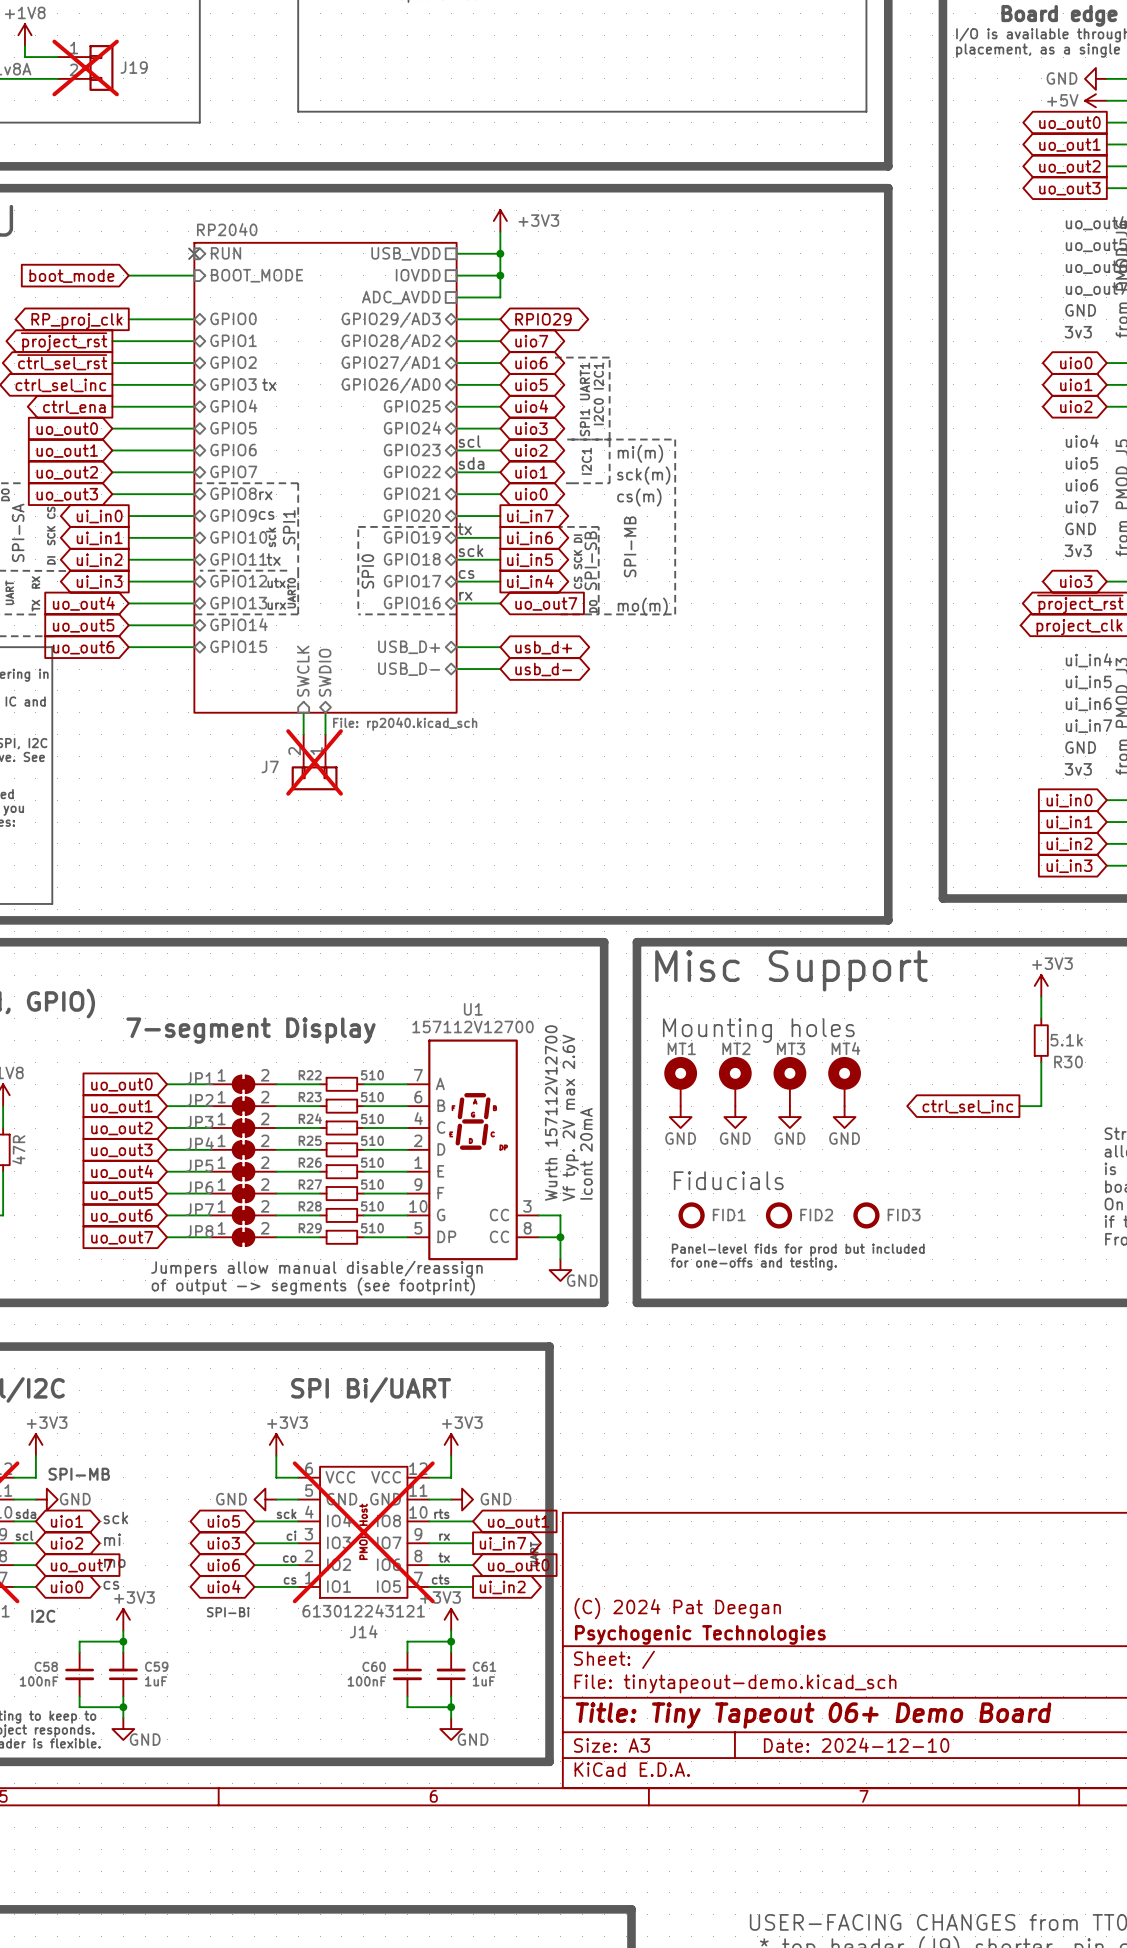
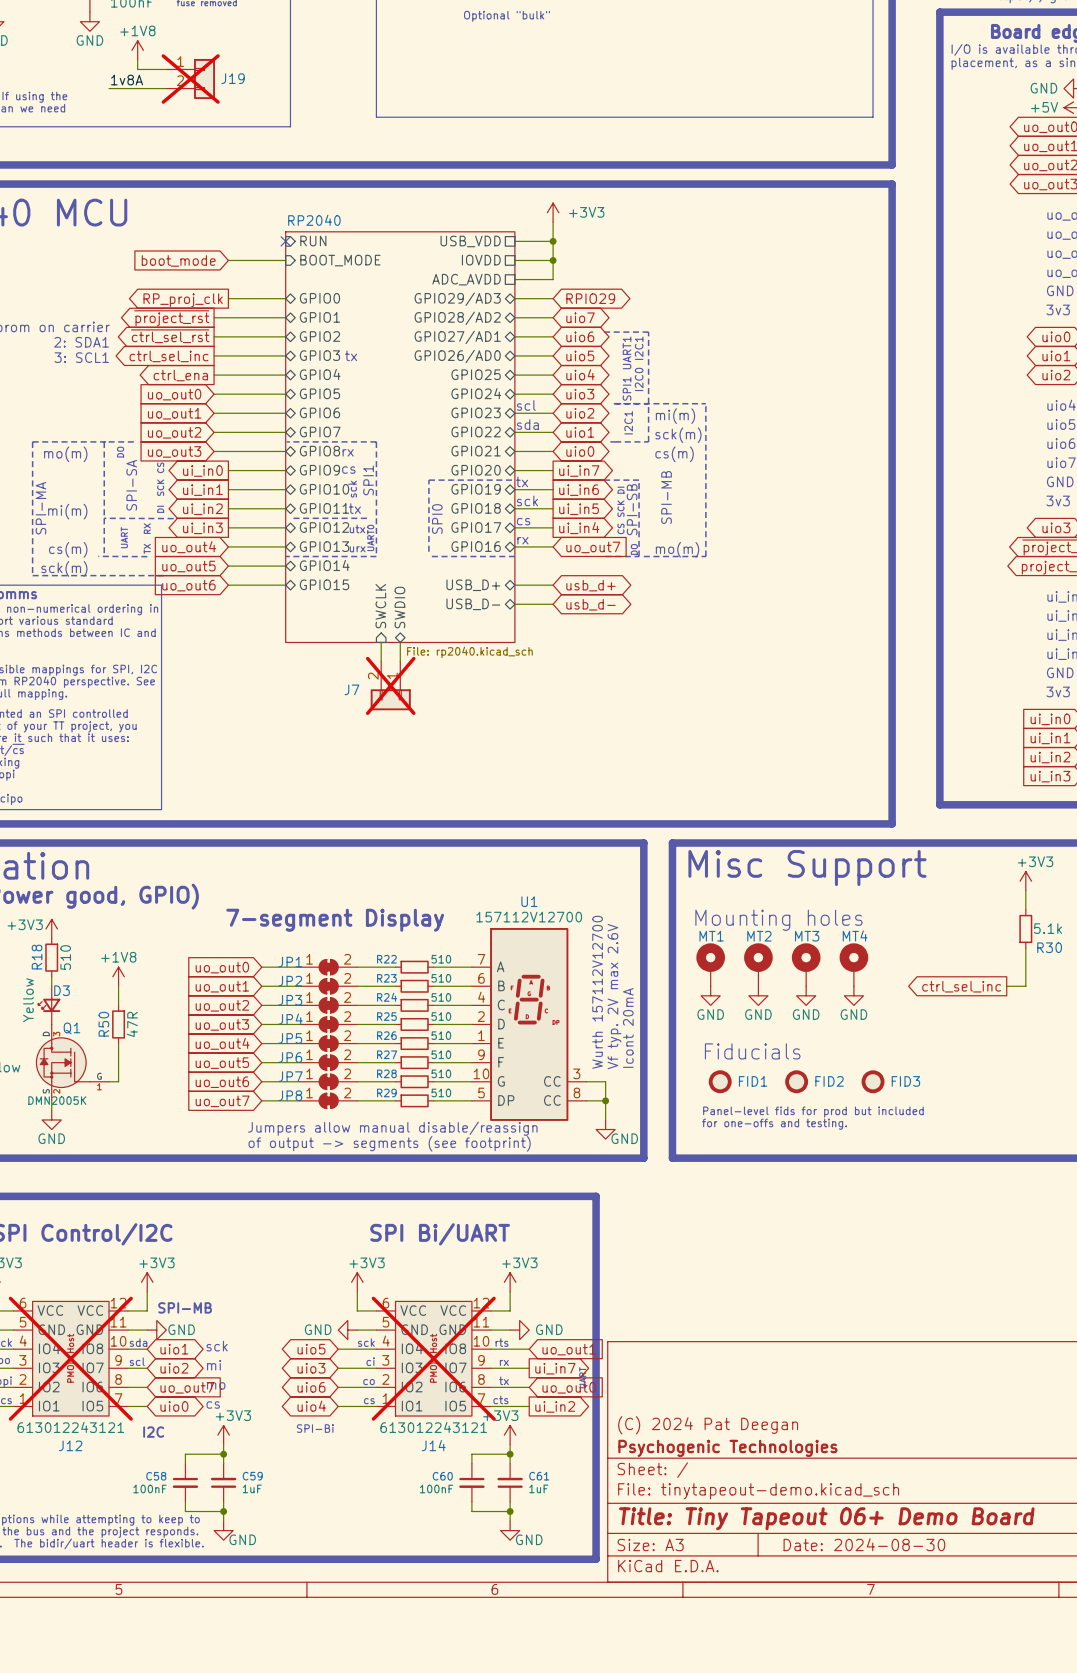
title block: Date: 2024-12-10 (856, 1745) -> Date: 2024-08-30 (864, 1544)

